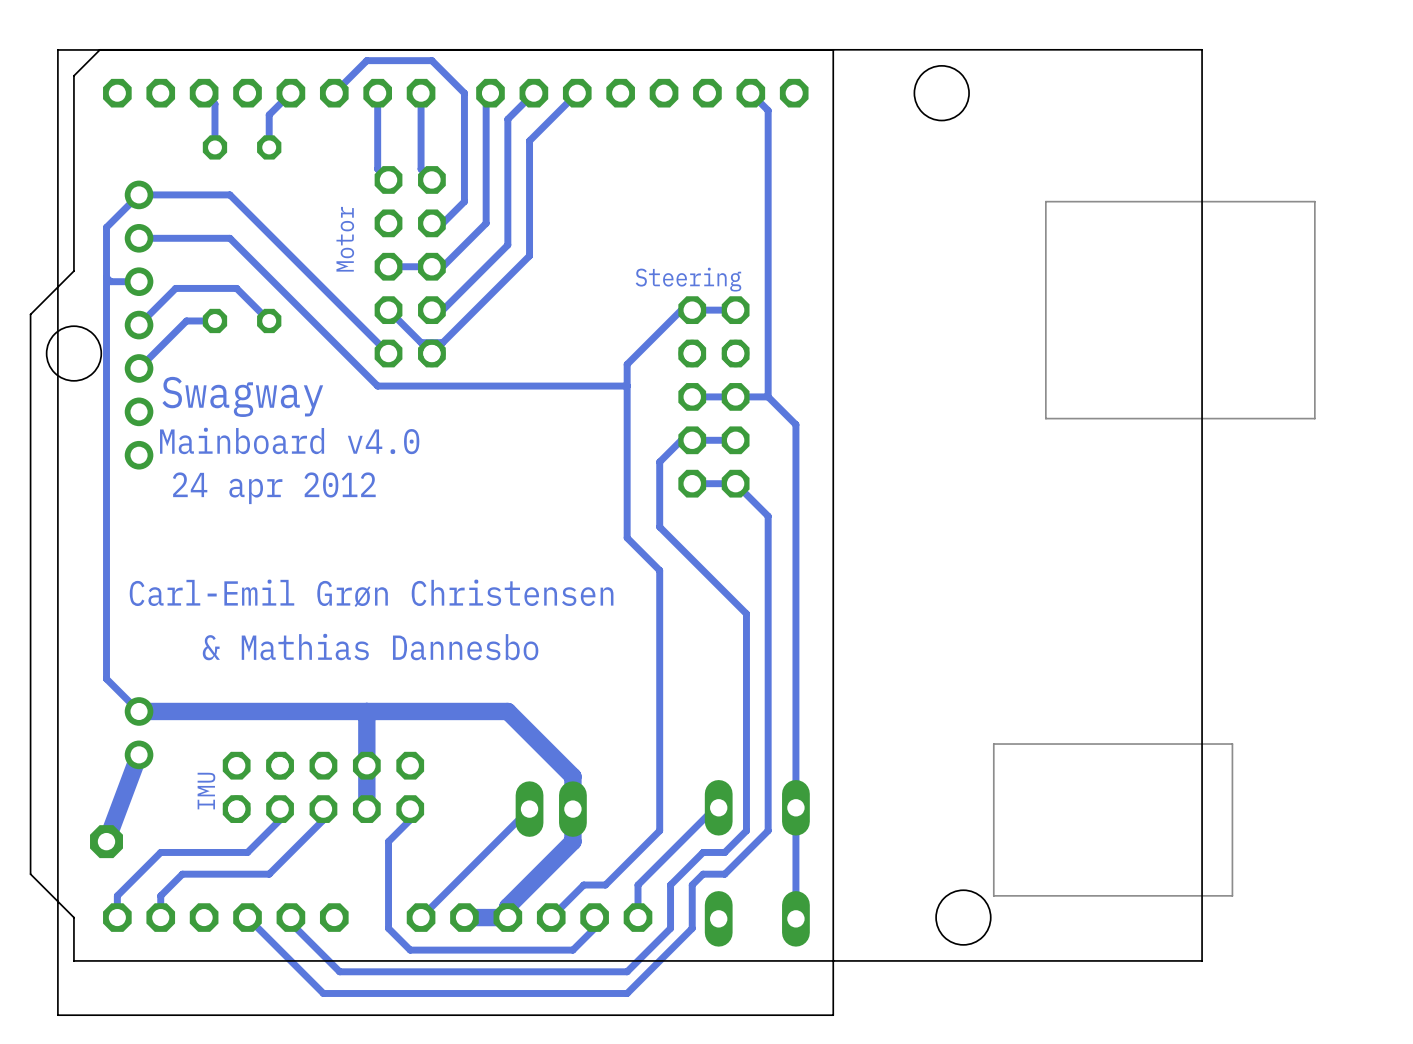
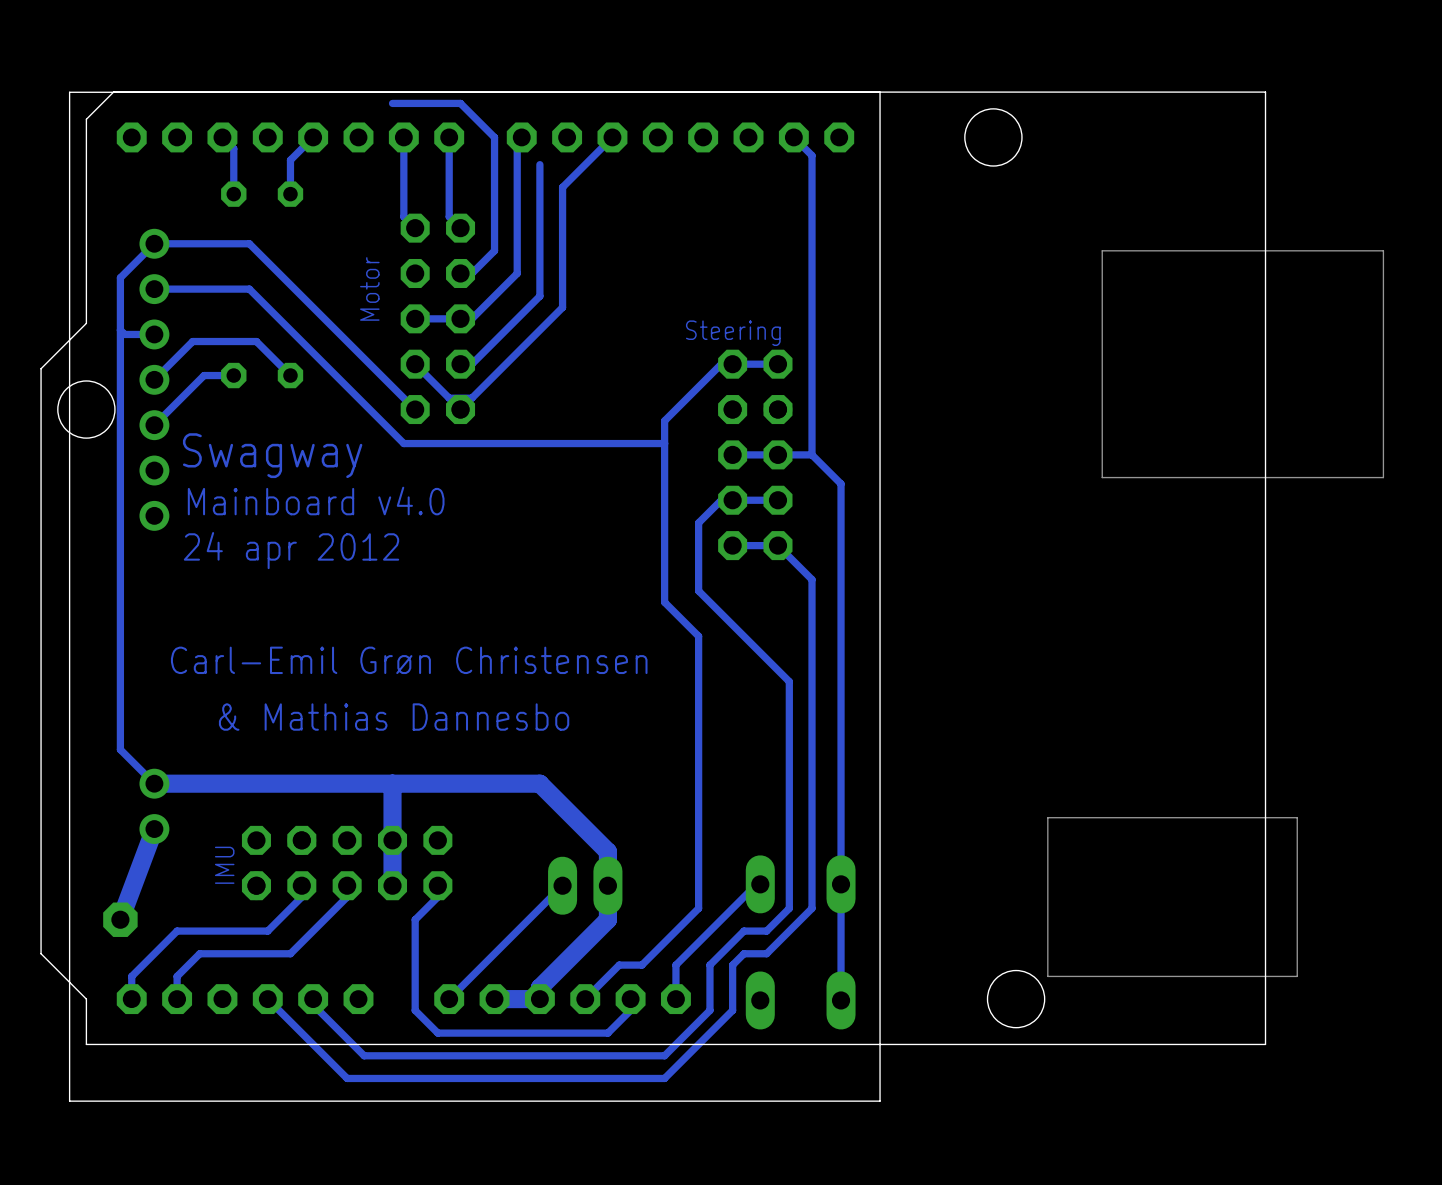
track: (366, 60) (334, 93) -> none
track: (533, 93) (507, 119) -> none

